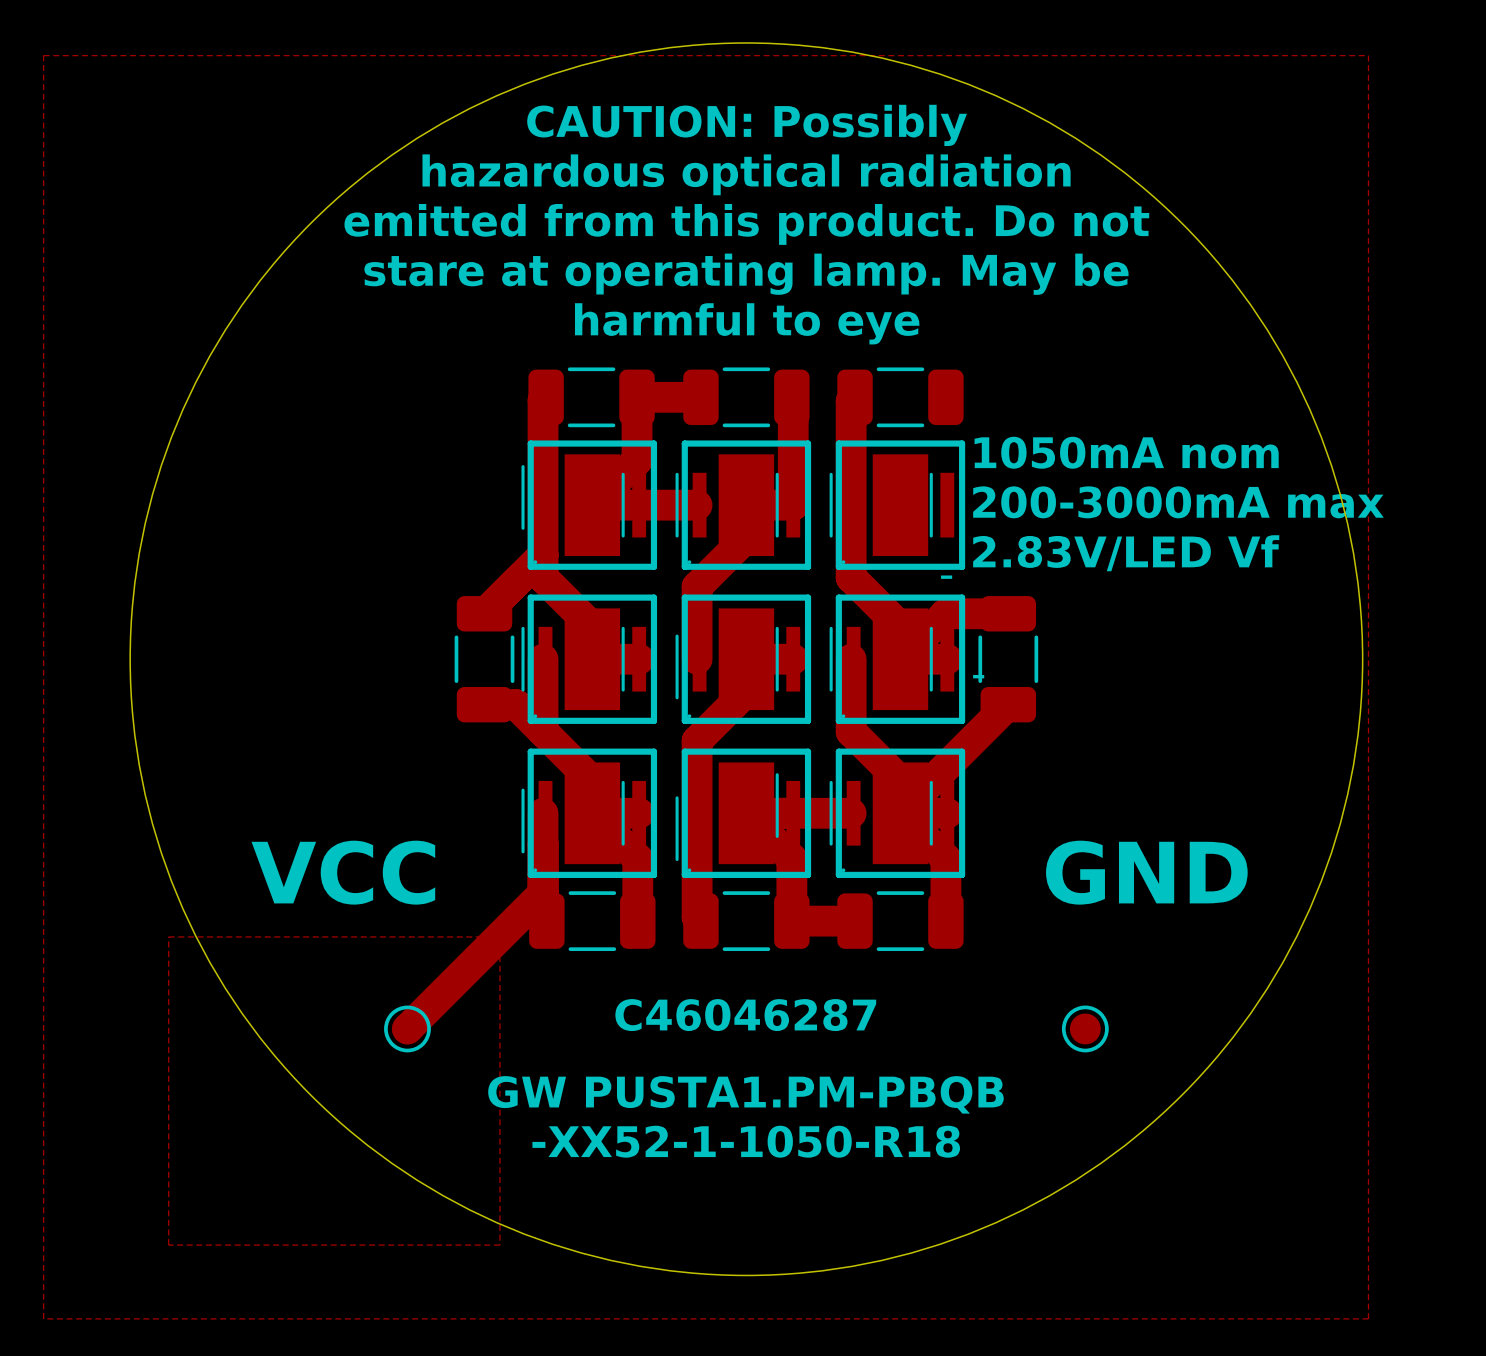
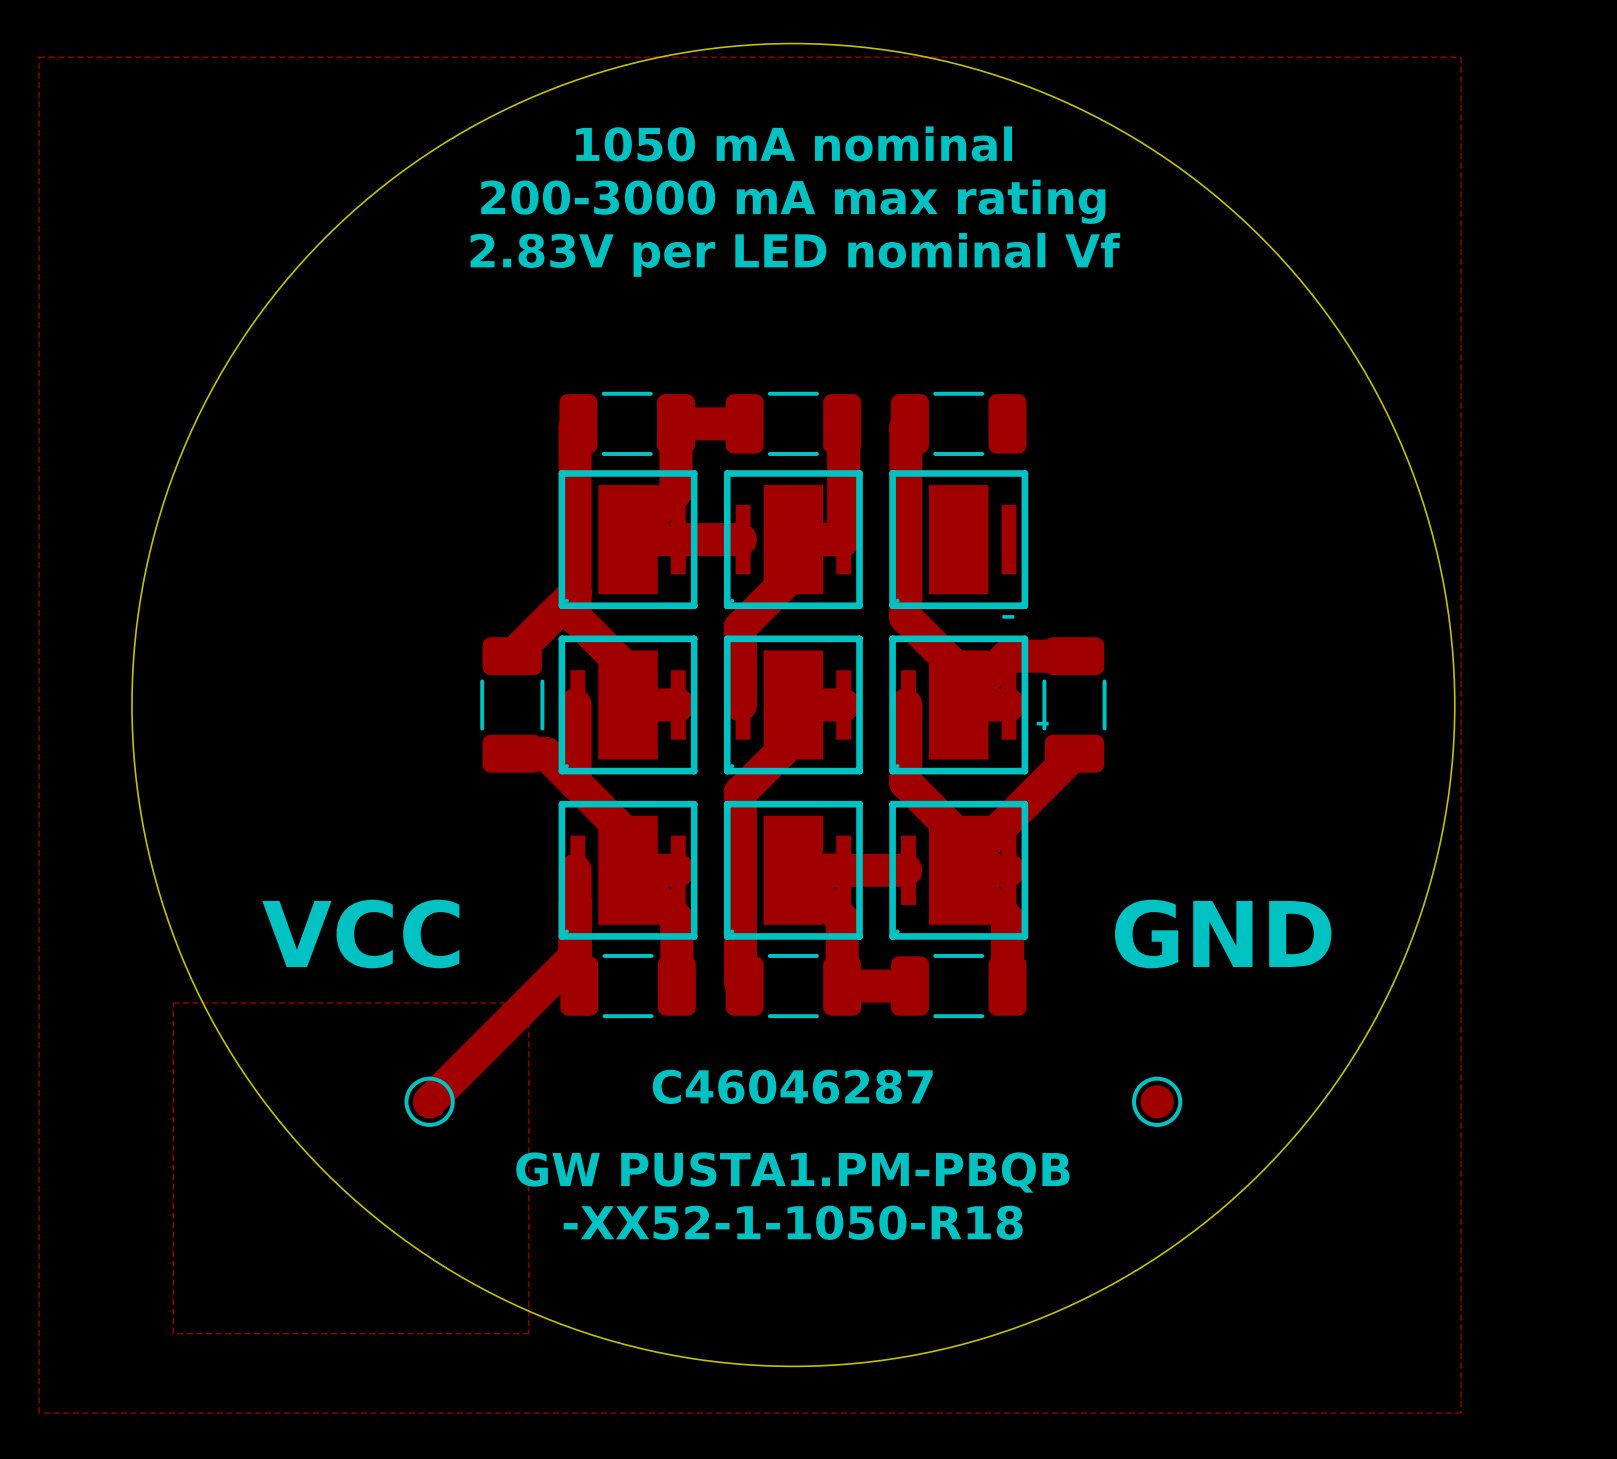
text: CAUTION: Possibly (747, 125) -> 1050 mA nominal (794, 143)
text: hazardous optical radiation (746, 174) -> 200-3000 mA max rating (793, 201)
text: emitted from this product. Do not (746, 224) -> 2.83V per LED nominal Vf (795, 254)
text: stare at operating lamp. May be (746, 274) -> none
text: harmful to eye (747, 323) -> none
text: 1050mA nom (1126, 452) -> none
line: (523, 466) (523, 528) -> none
line: (623, 474) (623, 535) -> none
line: (677, 474) (677, 535) -> none
line: (777, 474) (777, 535) -> none
line: (831, 474) (831, 535) -> none
line: (931, 474) (931, 535) -> none
text: 200-3000mA max (1178, 502) -> none
text: 2.83V/LED Vf (1126, 553) -> none
line: (523, 628) (523, 690) -> none
line: (623, 628) (623, 690) -> none
line: (777, 628) (777, 690) -> none
line: (831, 628) (831, 690) -> none
line: (931, 628) (931, 690) -> none
line: (677, 636) (677, 697) -> none
line: (777, 774) (777, 836) -> none
line: (623, 782) (623, 844) -> none
line: (831, 782) (831, 844) -> none
line: (931, 782) (931, 844) -> none
line: (523, 790) (523, 851) -> none
line: (677, 797) (677, 859) -> none

